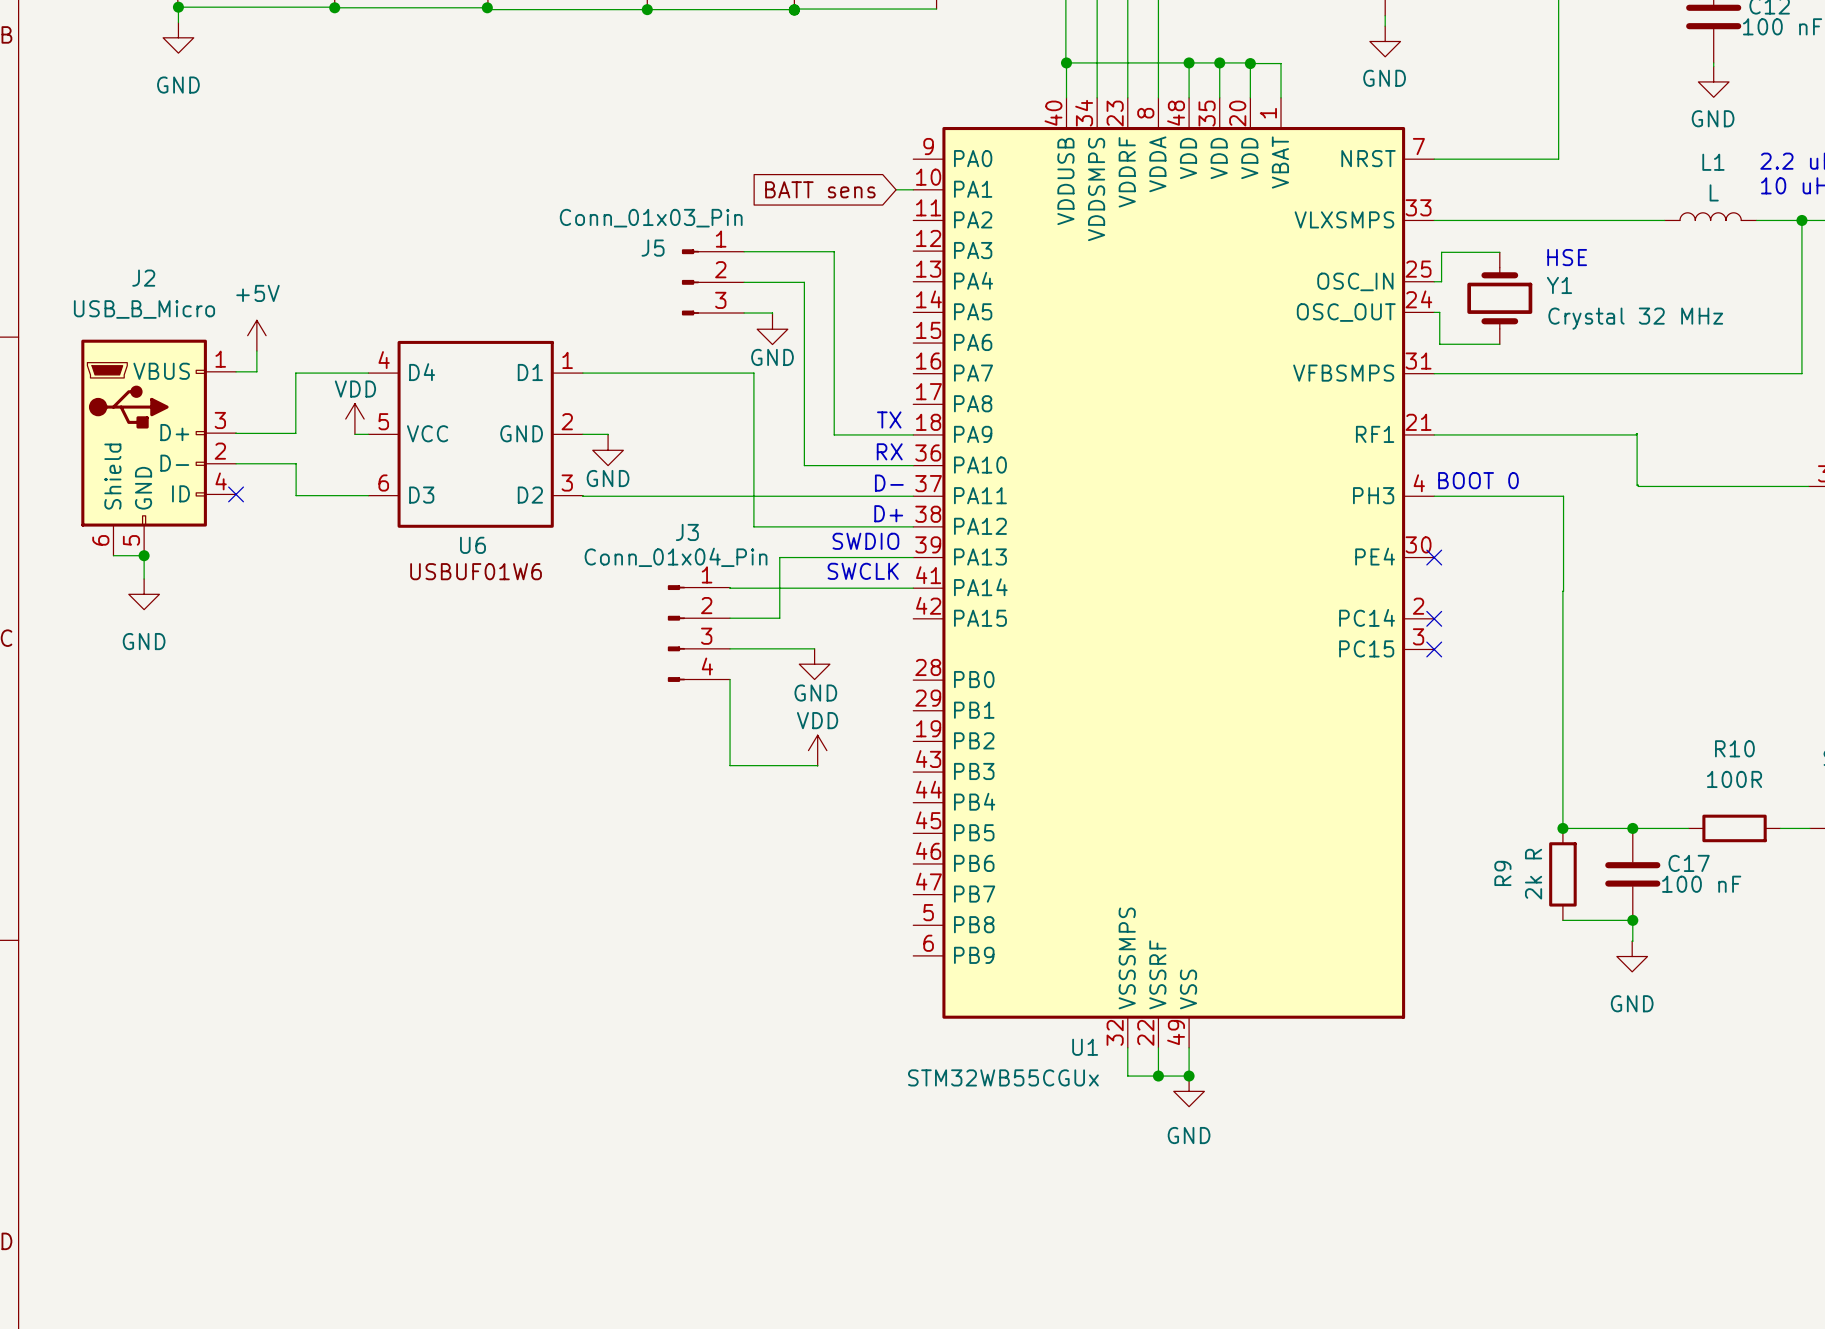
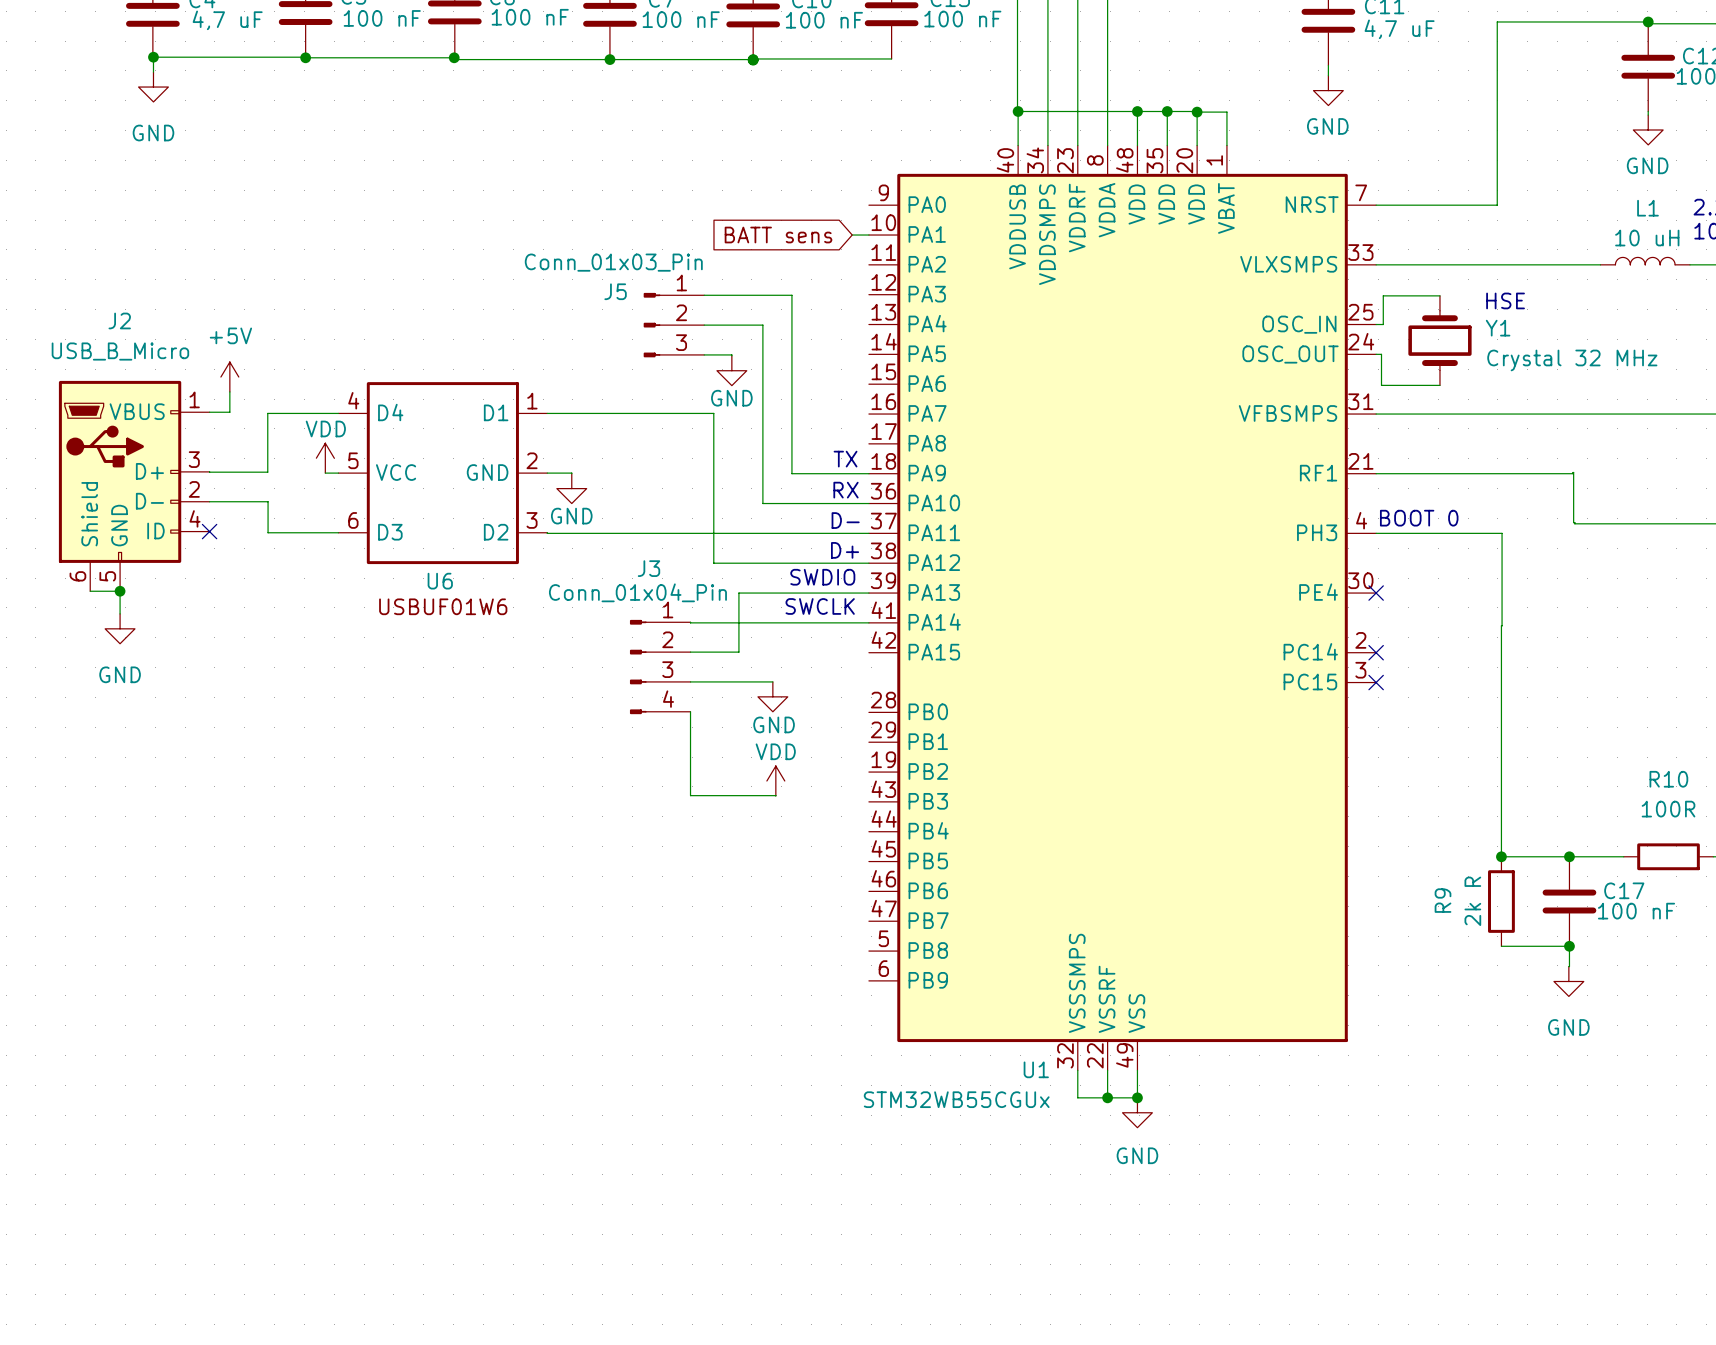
L1 value: L (1714, 192) -> 10 uH (1647, 238)

